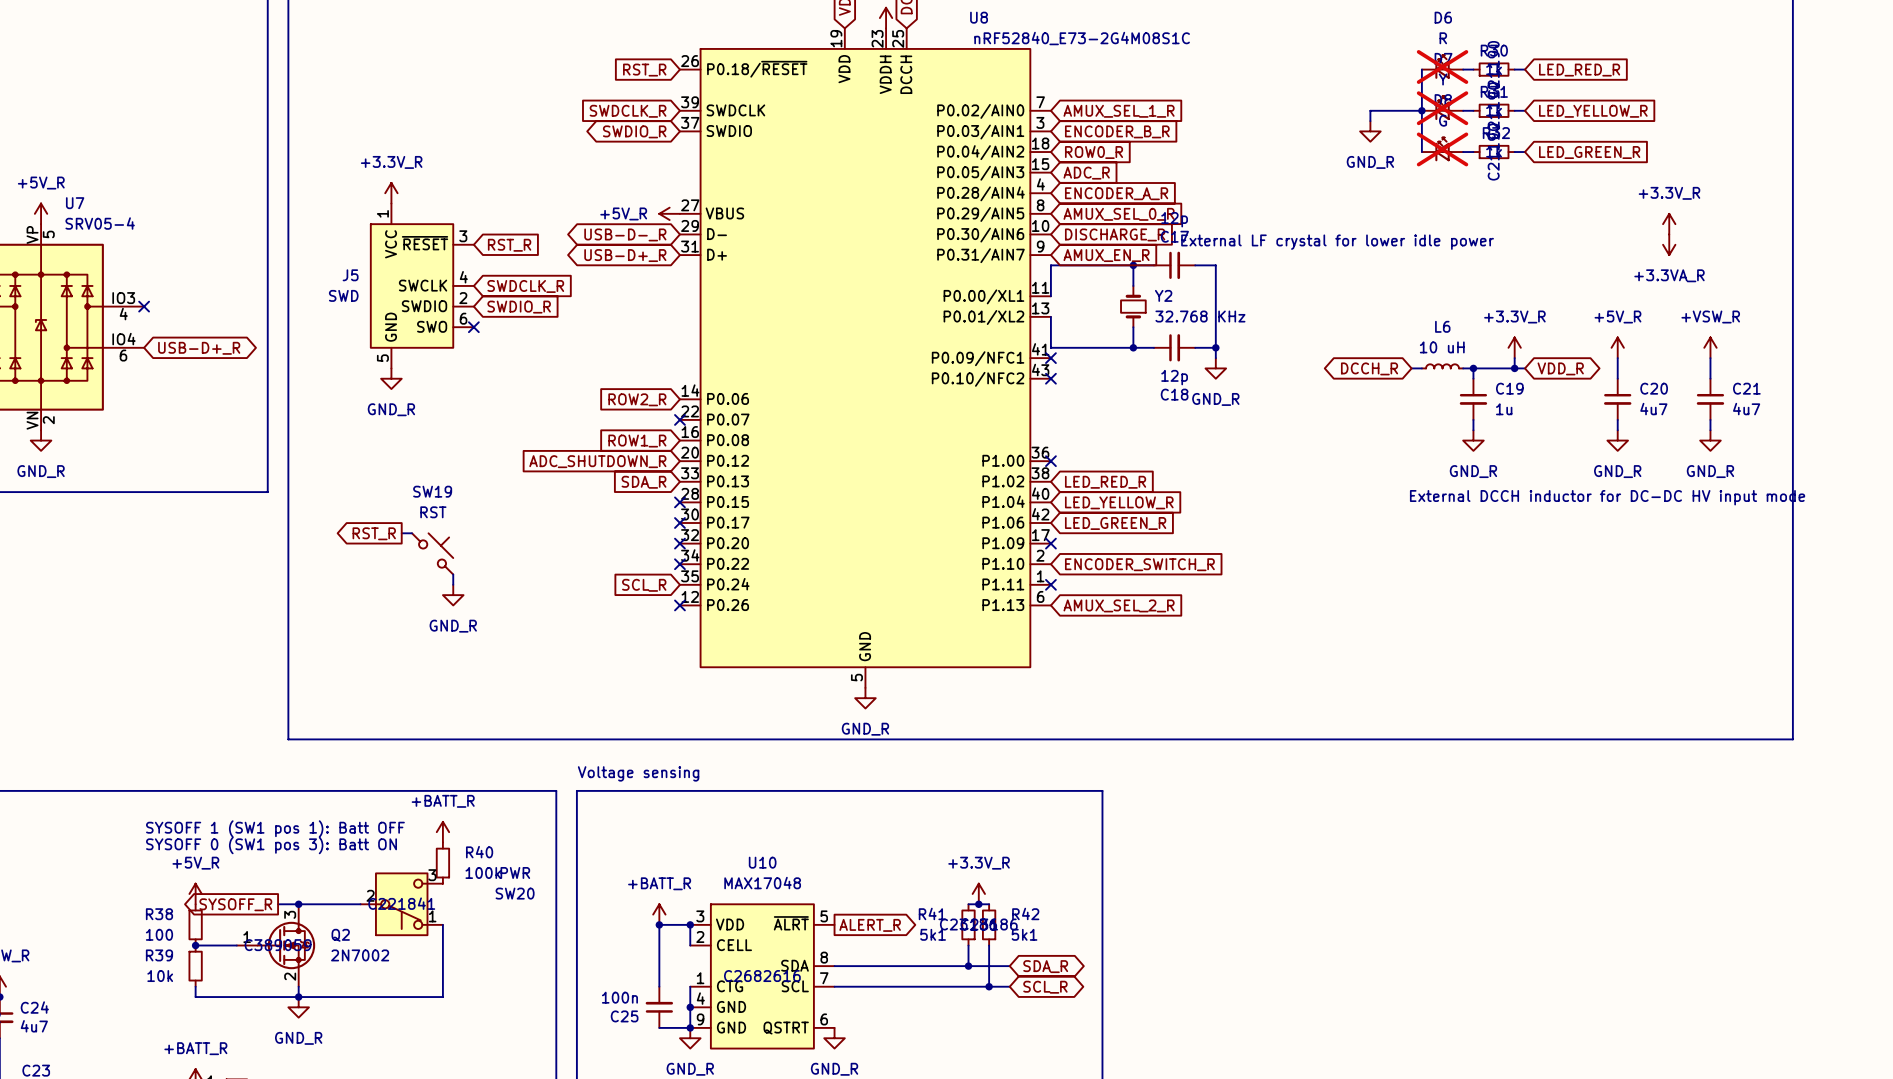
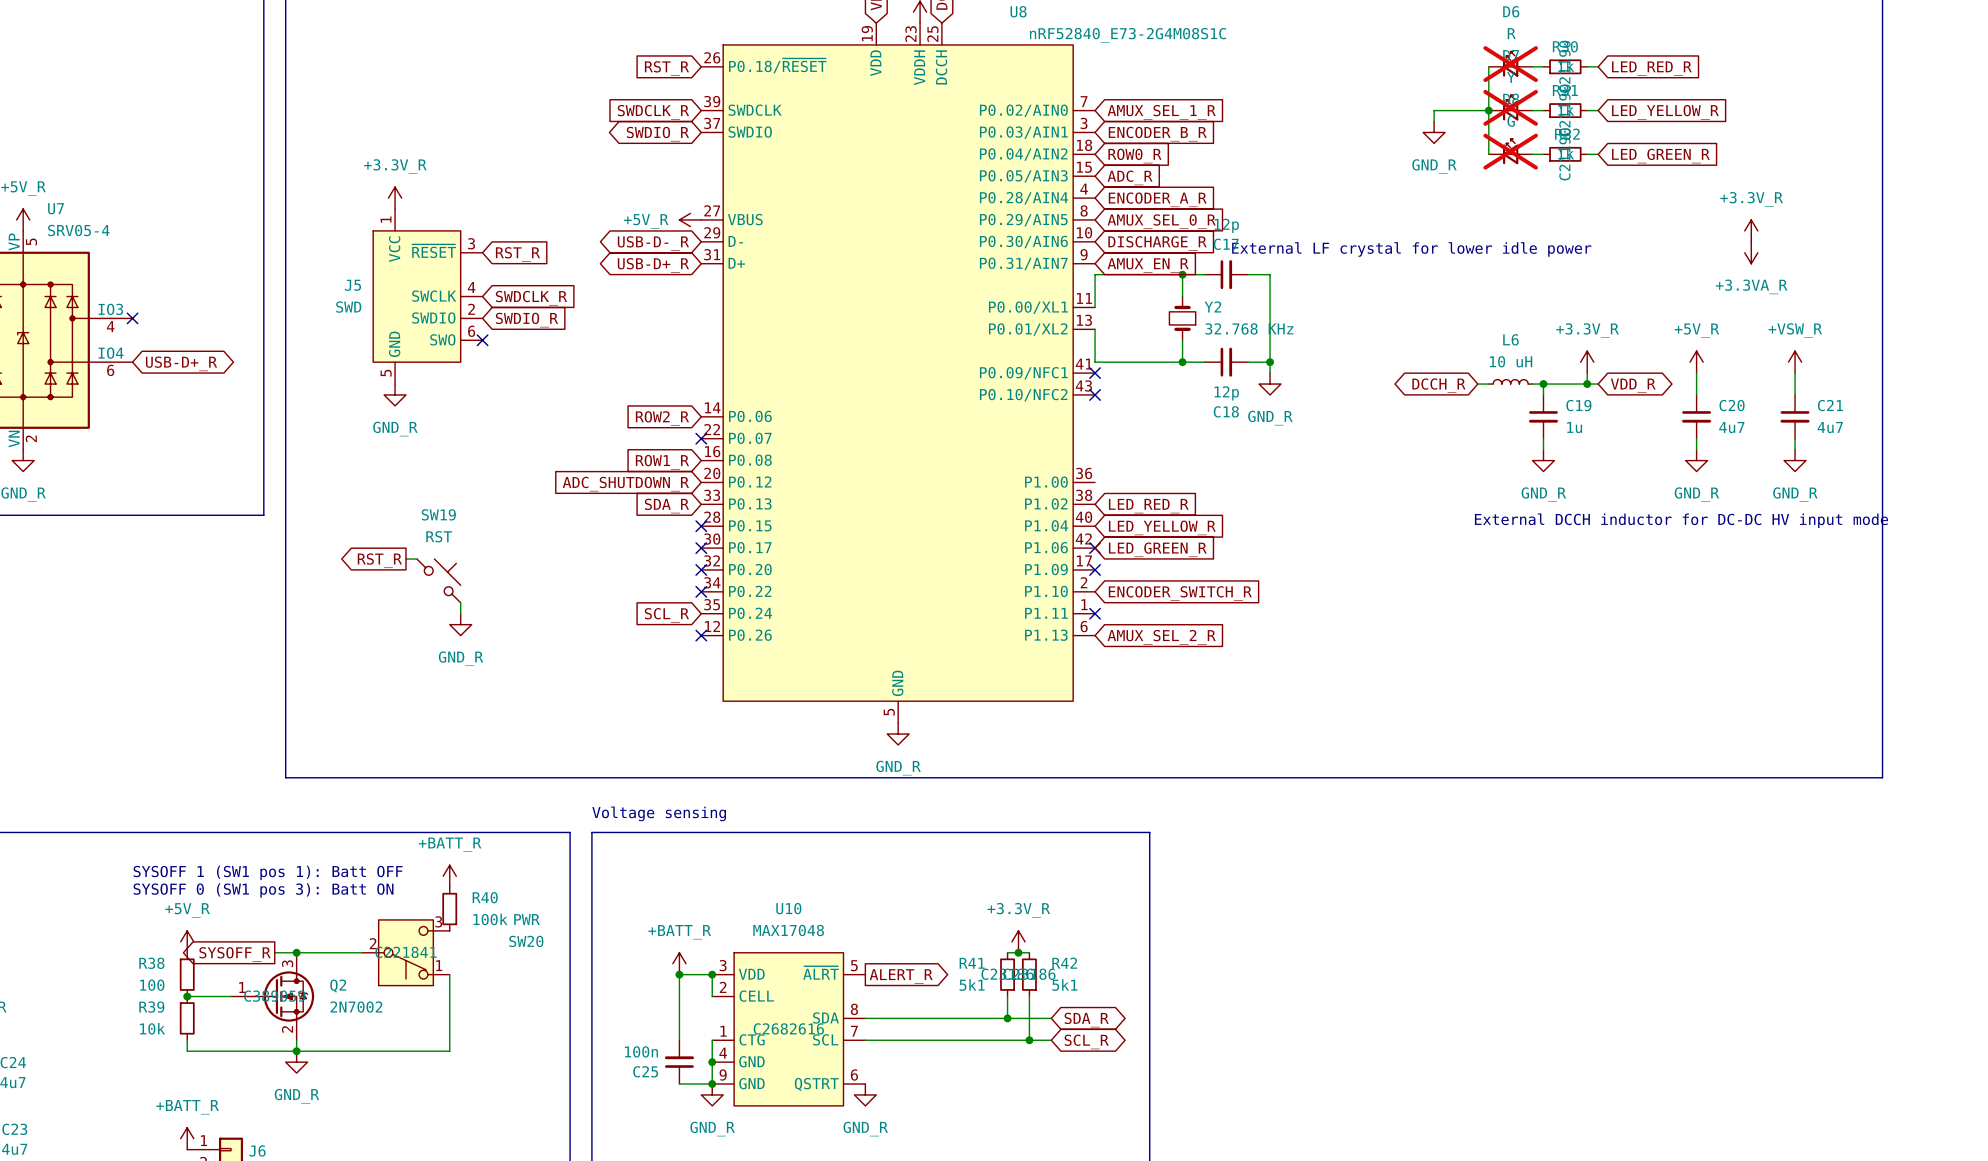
no-connect mark: (1050, 461) -> none
no-connect mark: none -> (1095, 548)

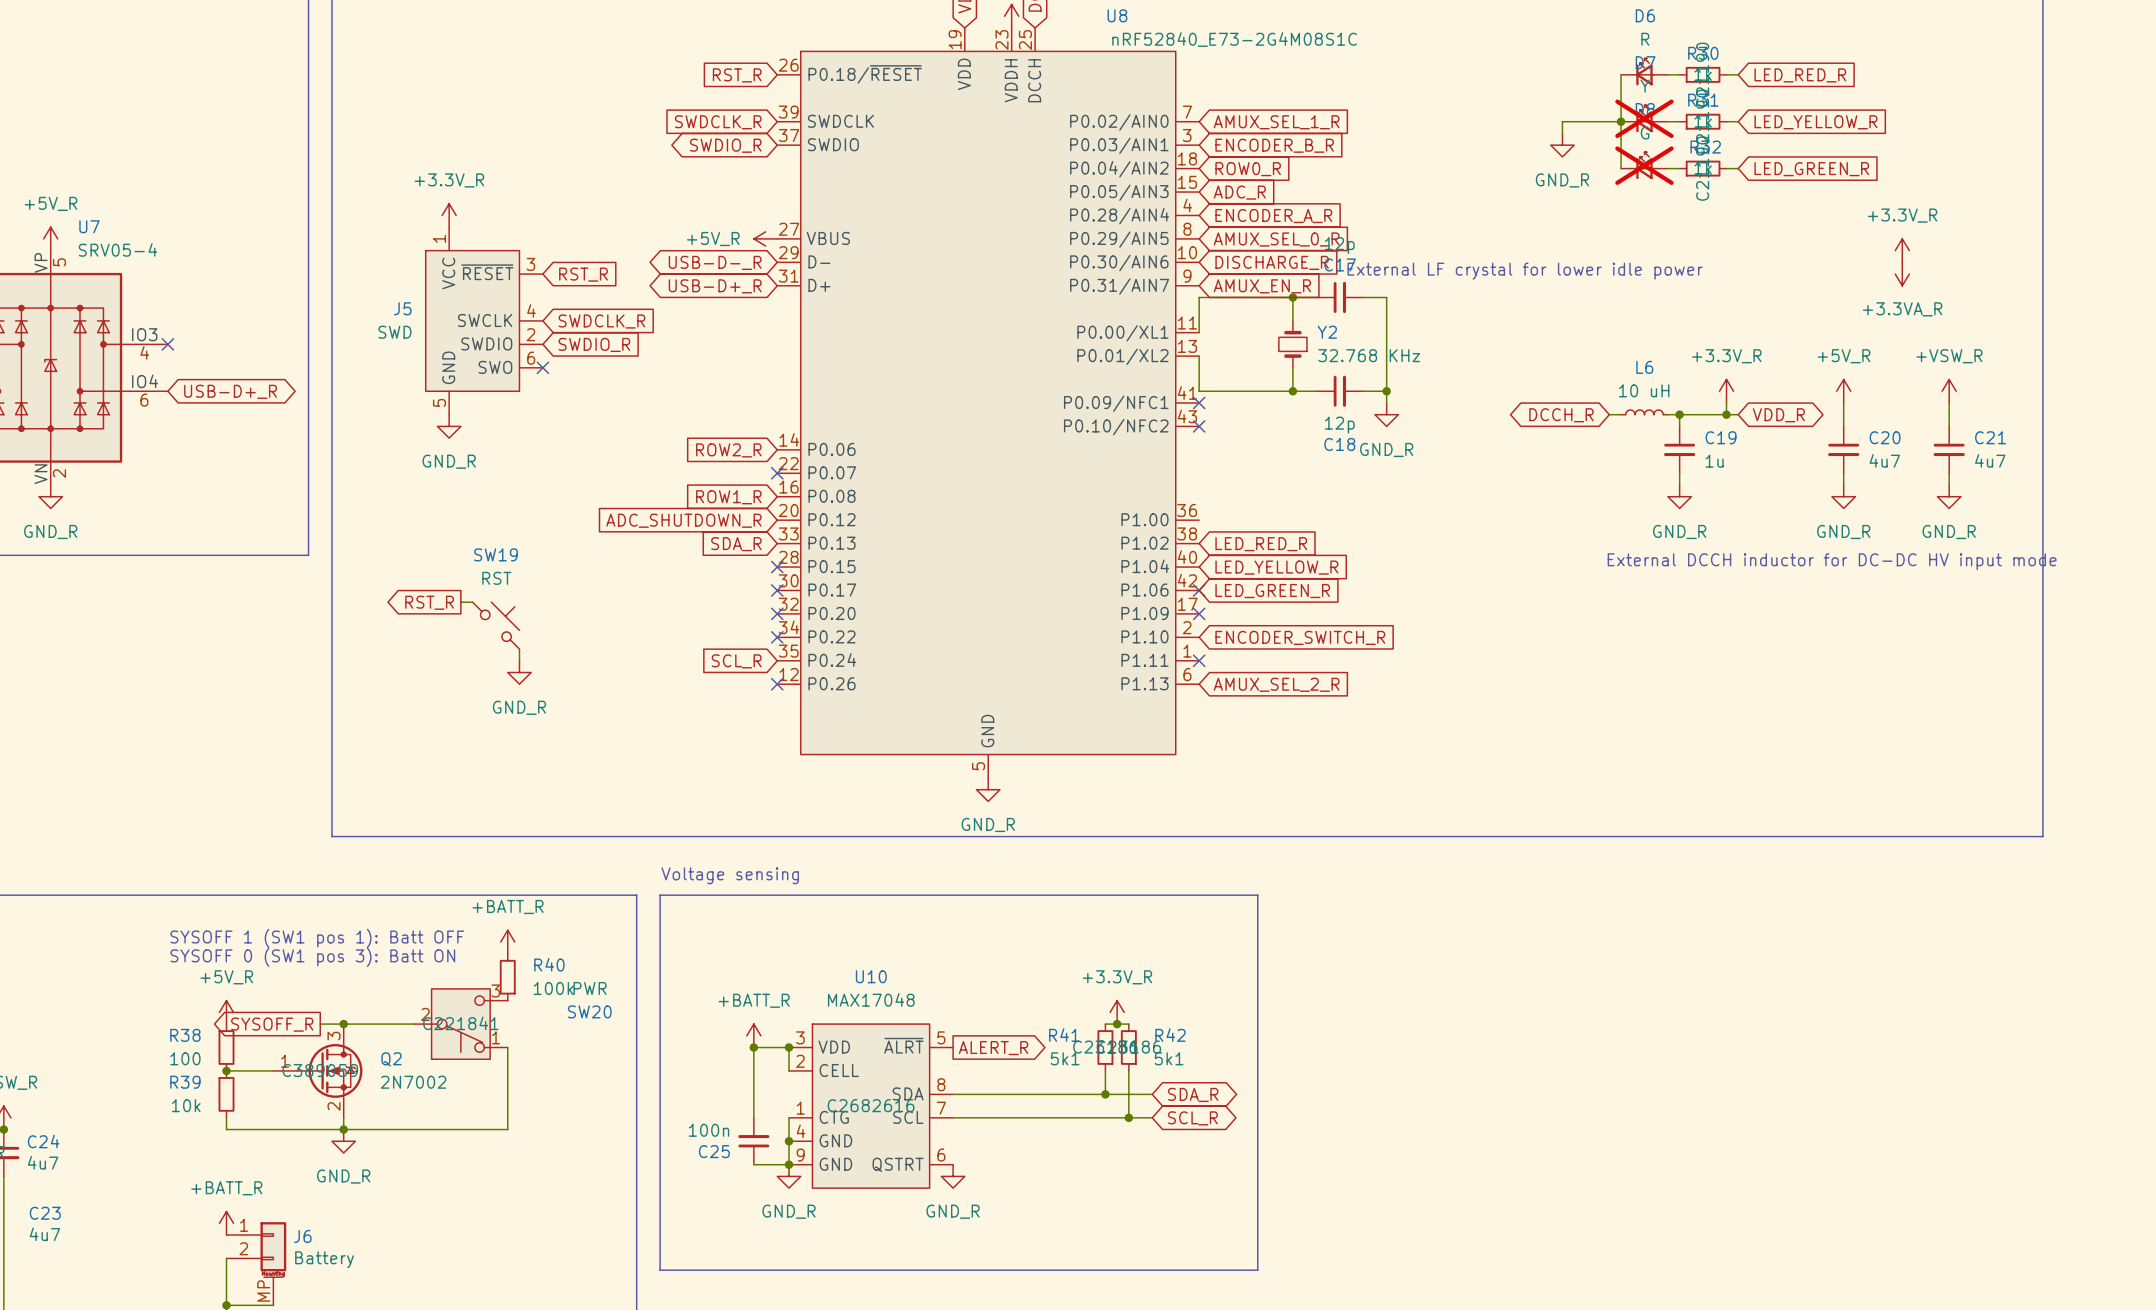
D6 do-not-place cross: (1510, 64) -> none

